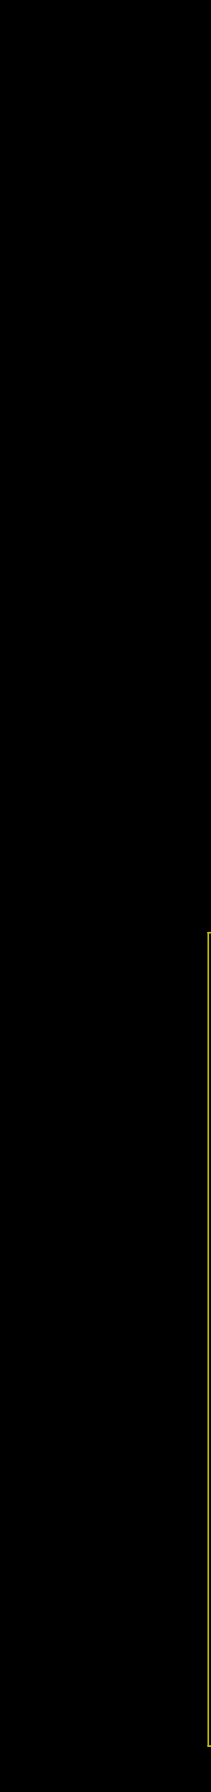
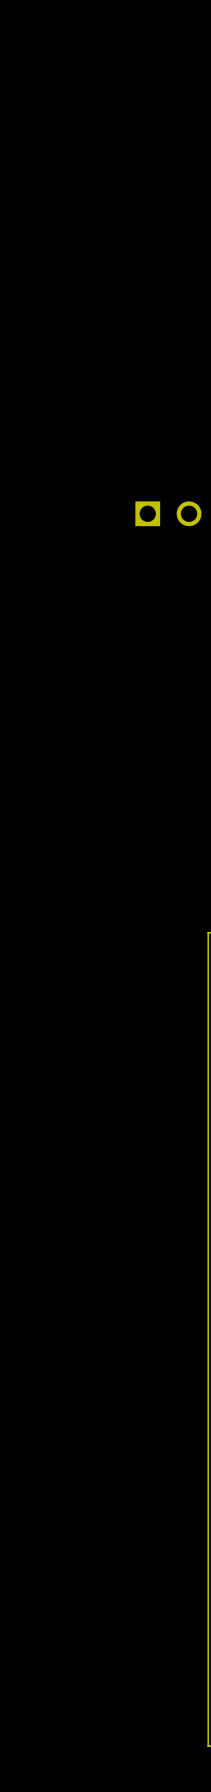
part: none -> (168, 513)

